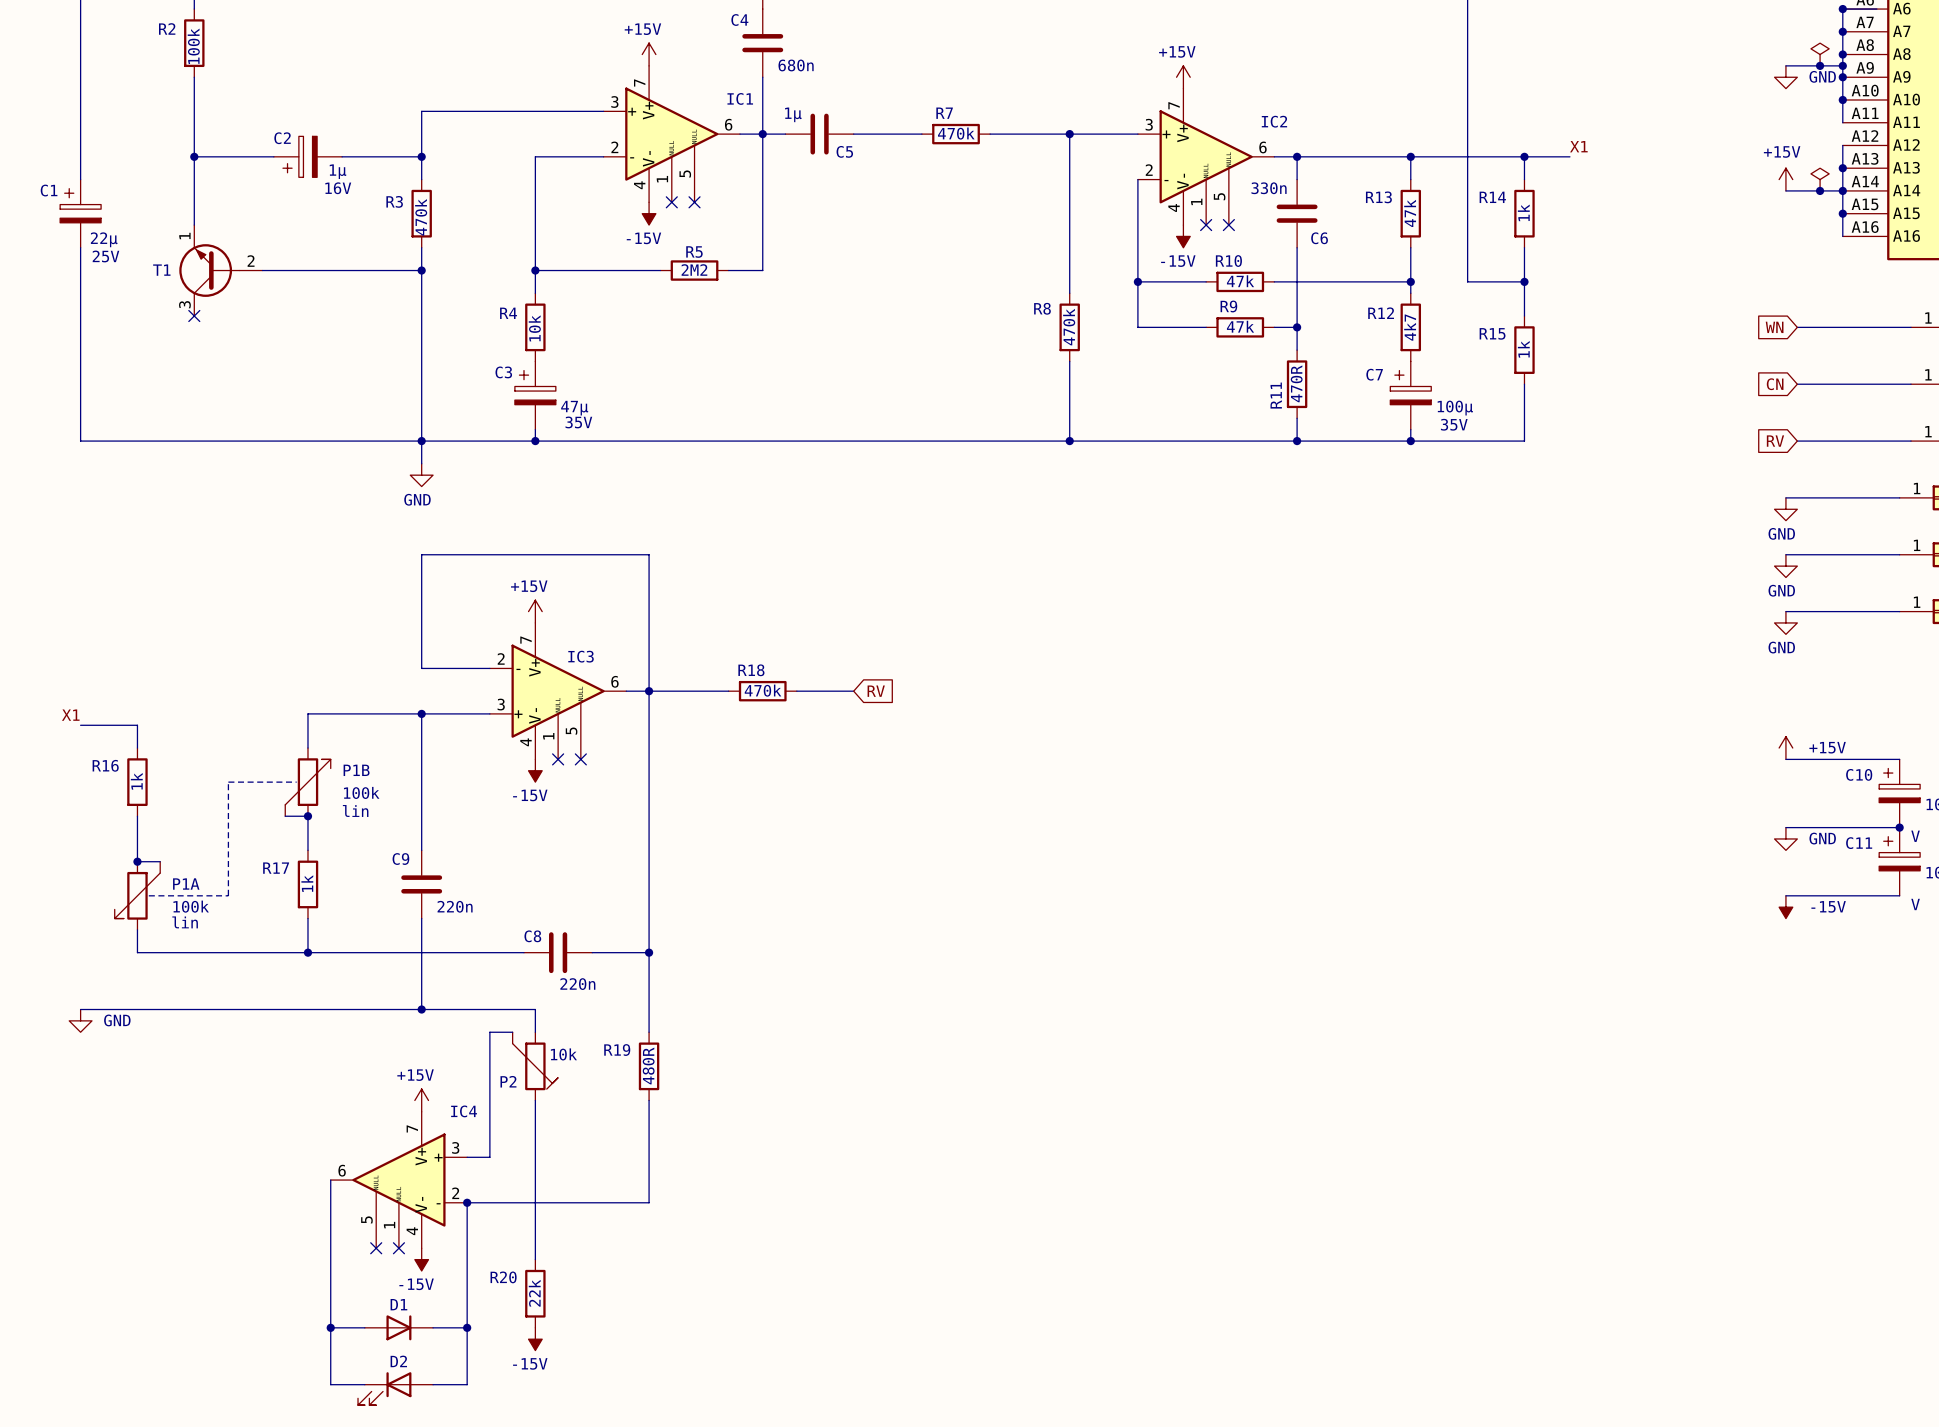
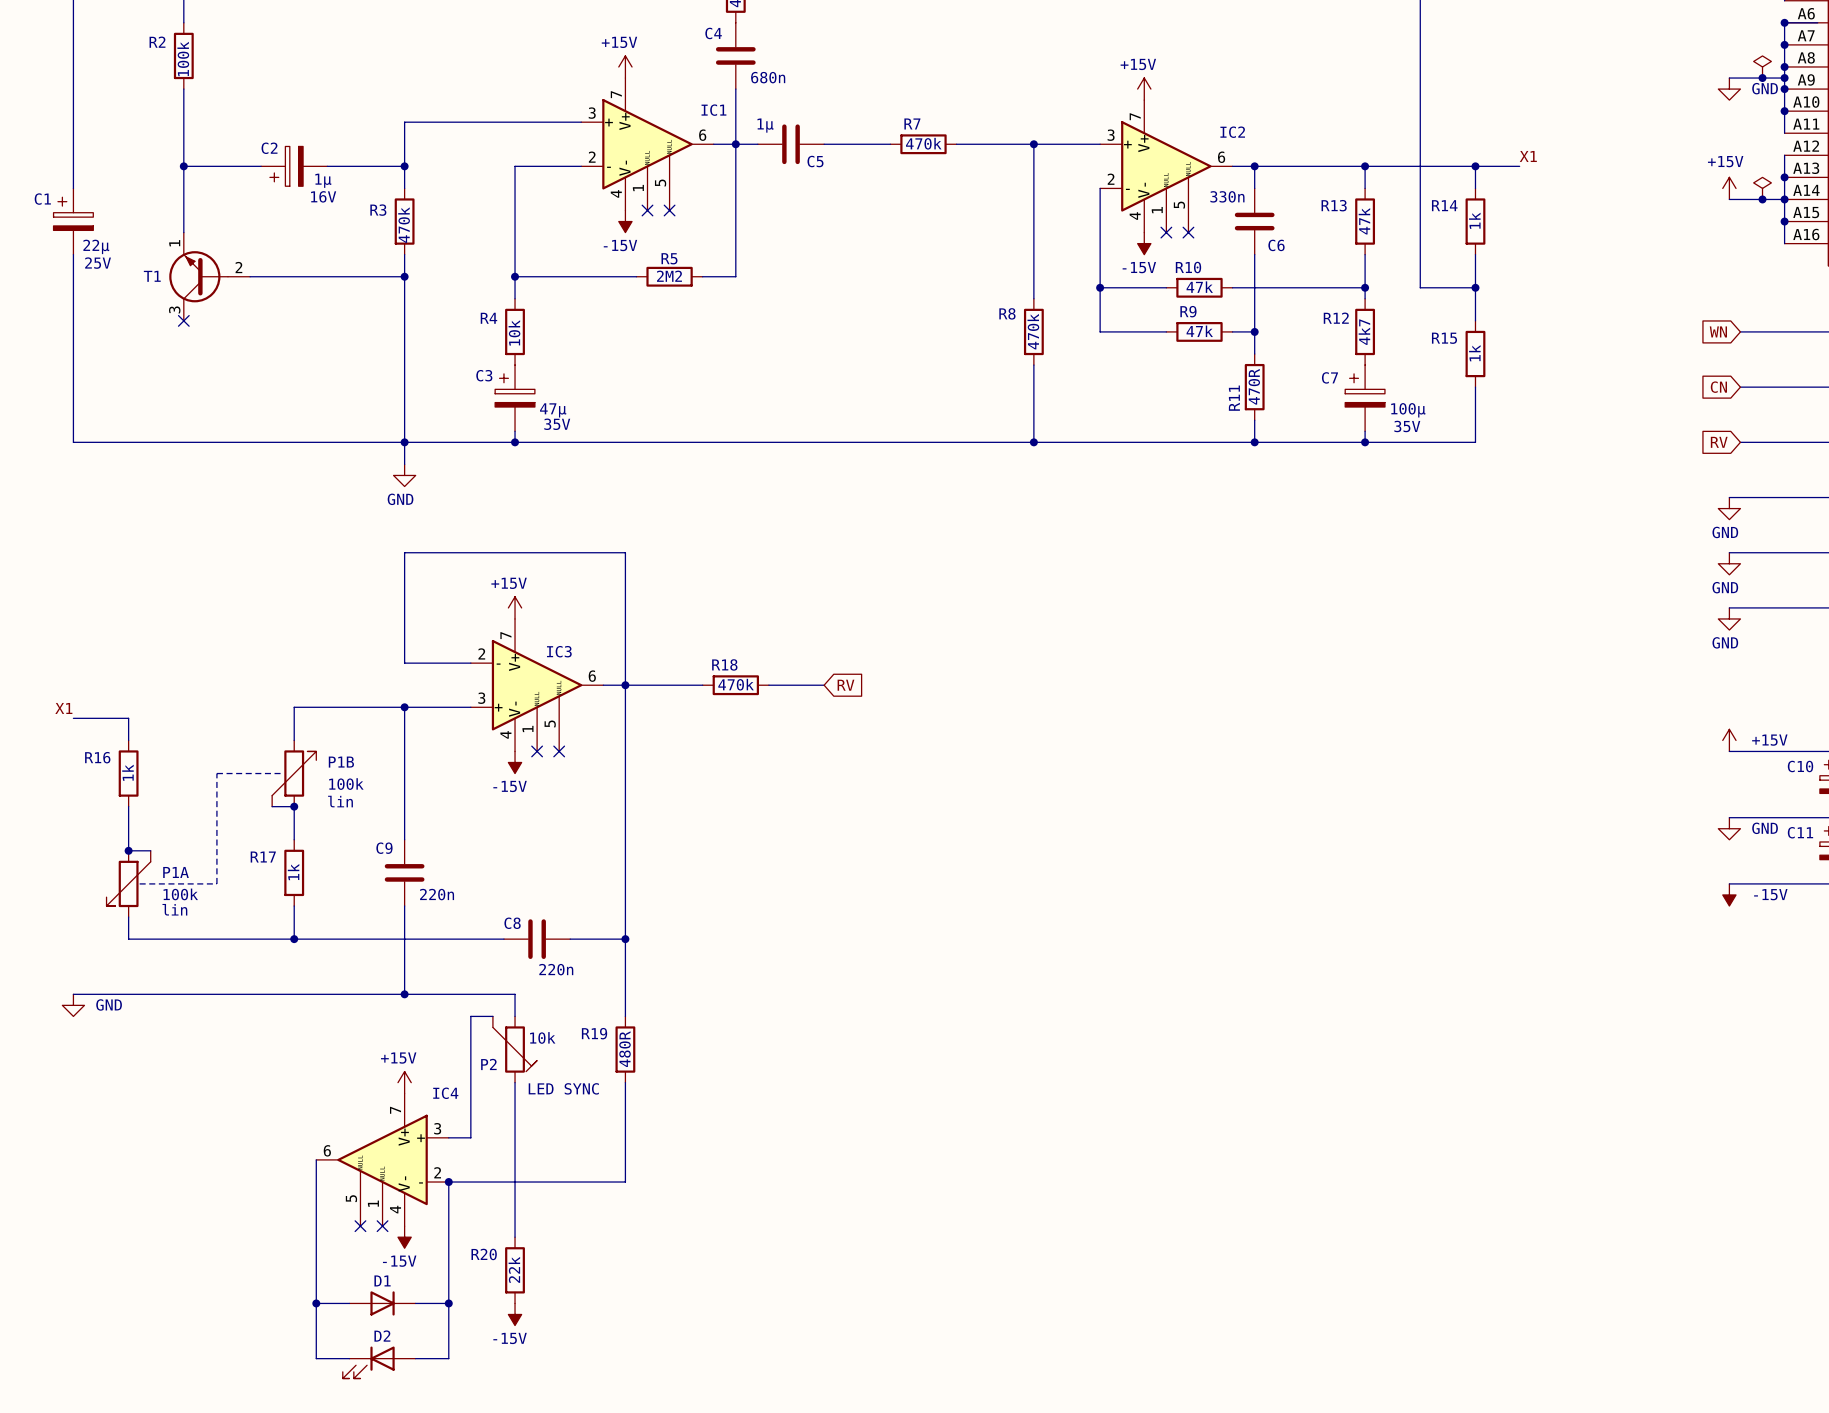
P2 text: none -> LED SYNC (563, 1088)

